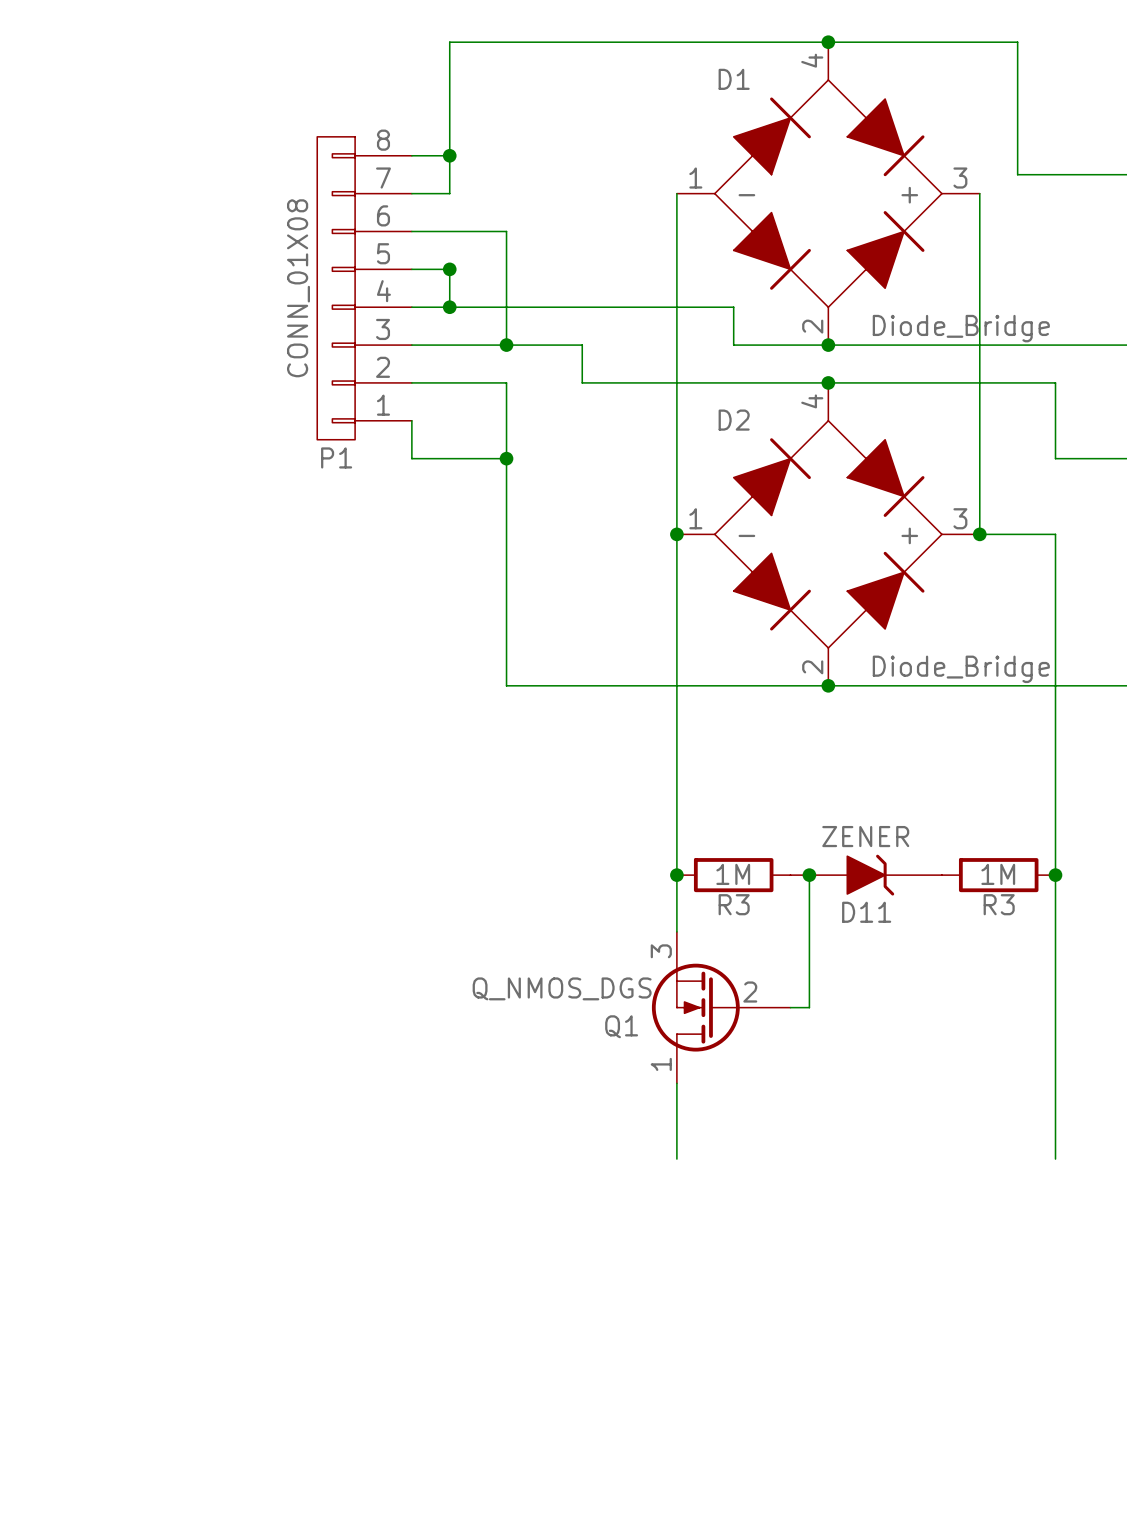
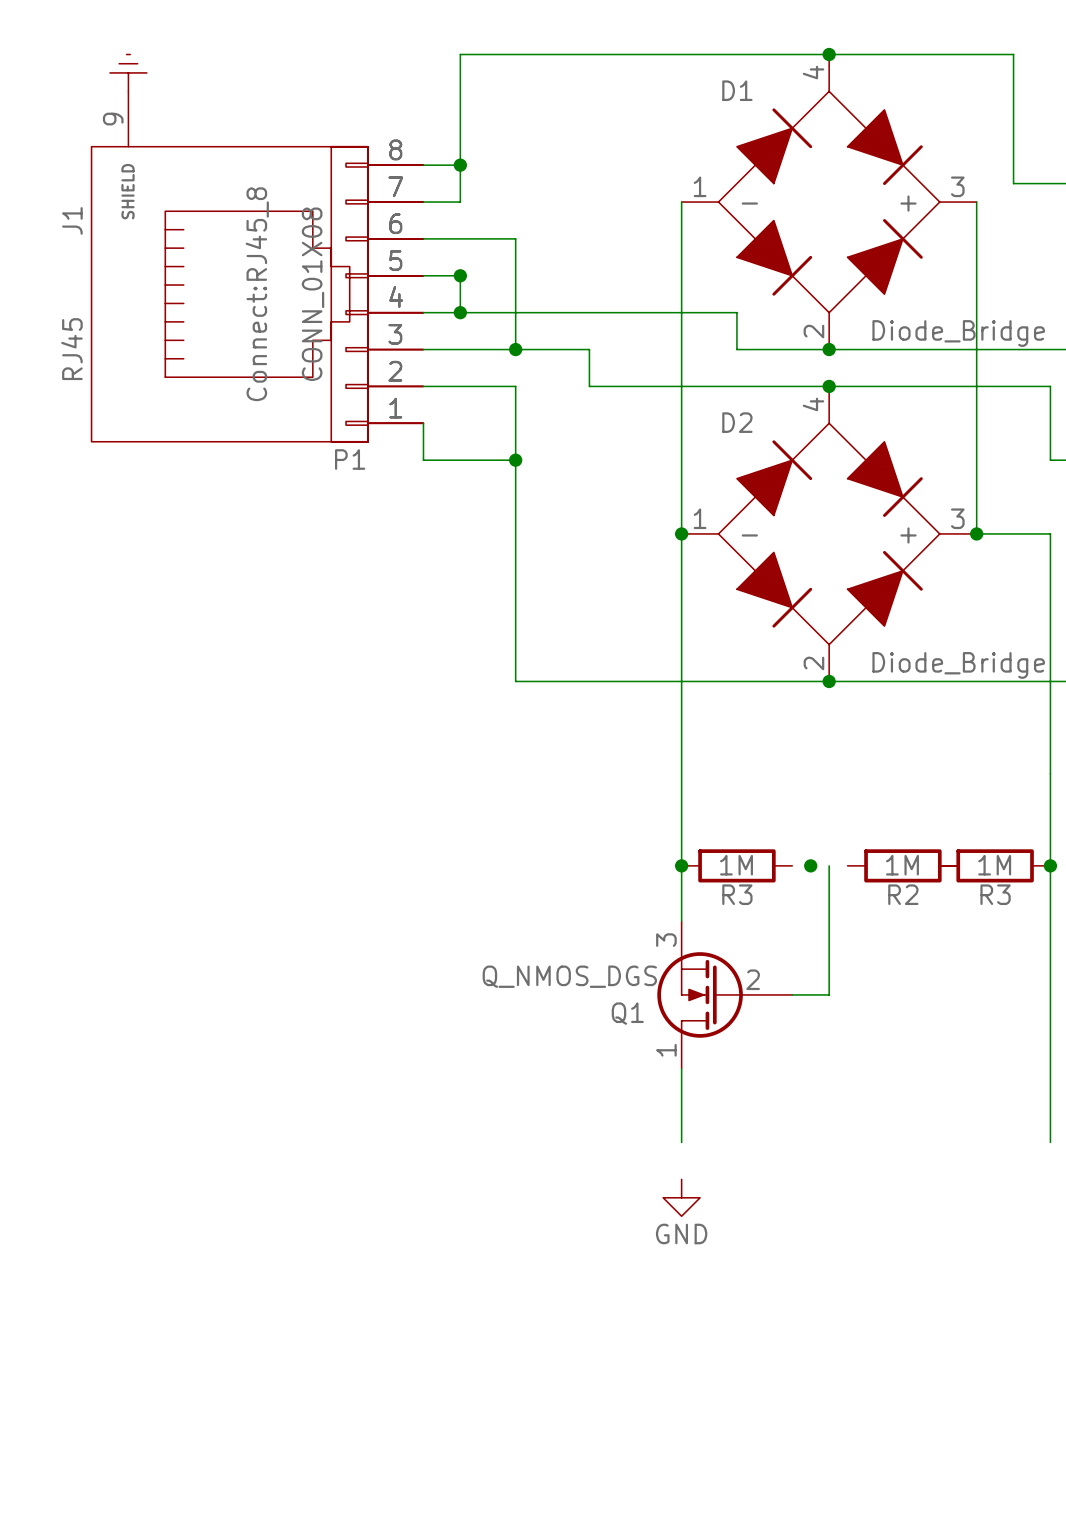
power symbol: none -> (128, 72)
J1: none -> RJ45 (257, 266)
wire: (809, 875) (809, 1007) -> (829, 865) (829, 994) (810, 994)
D11: ZENER (866, 875) -> none
R2: none -> 1M (902, 865)
power symbol: none -> GND (681, 1197)

